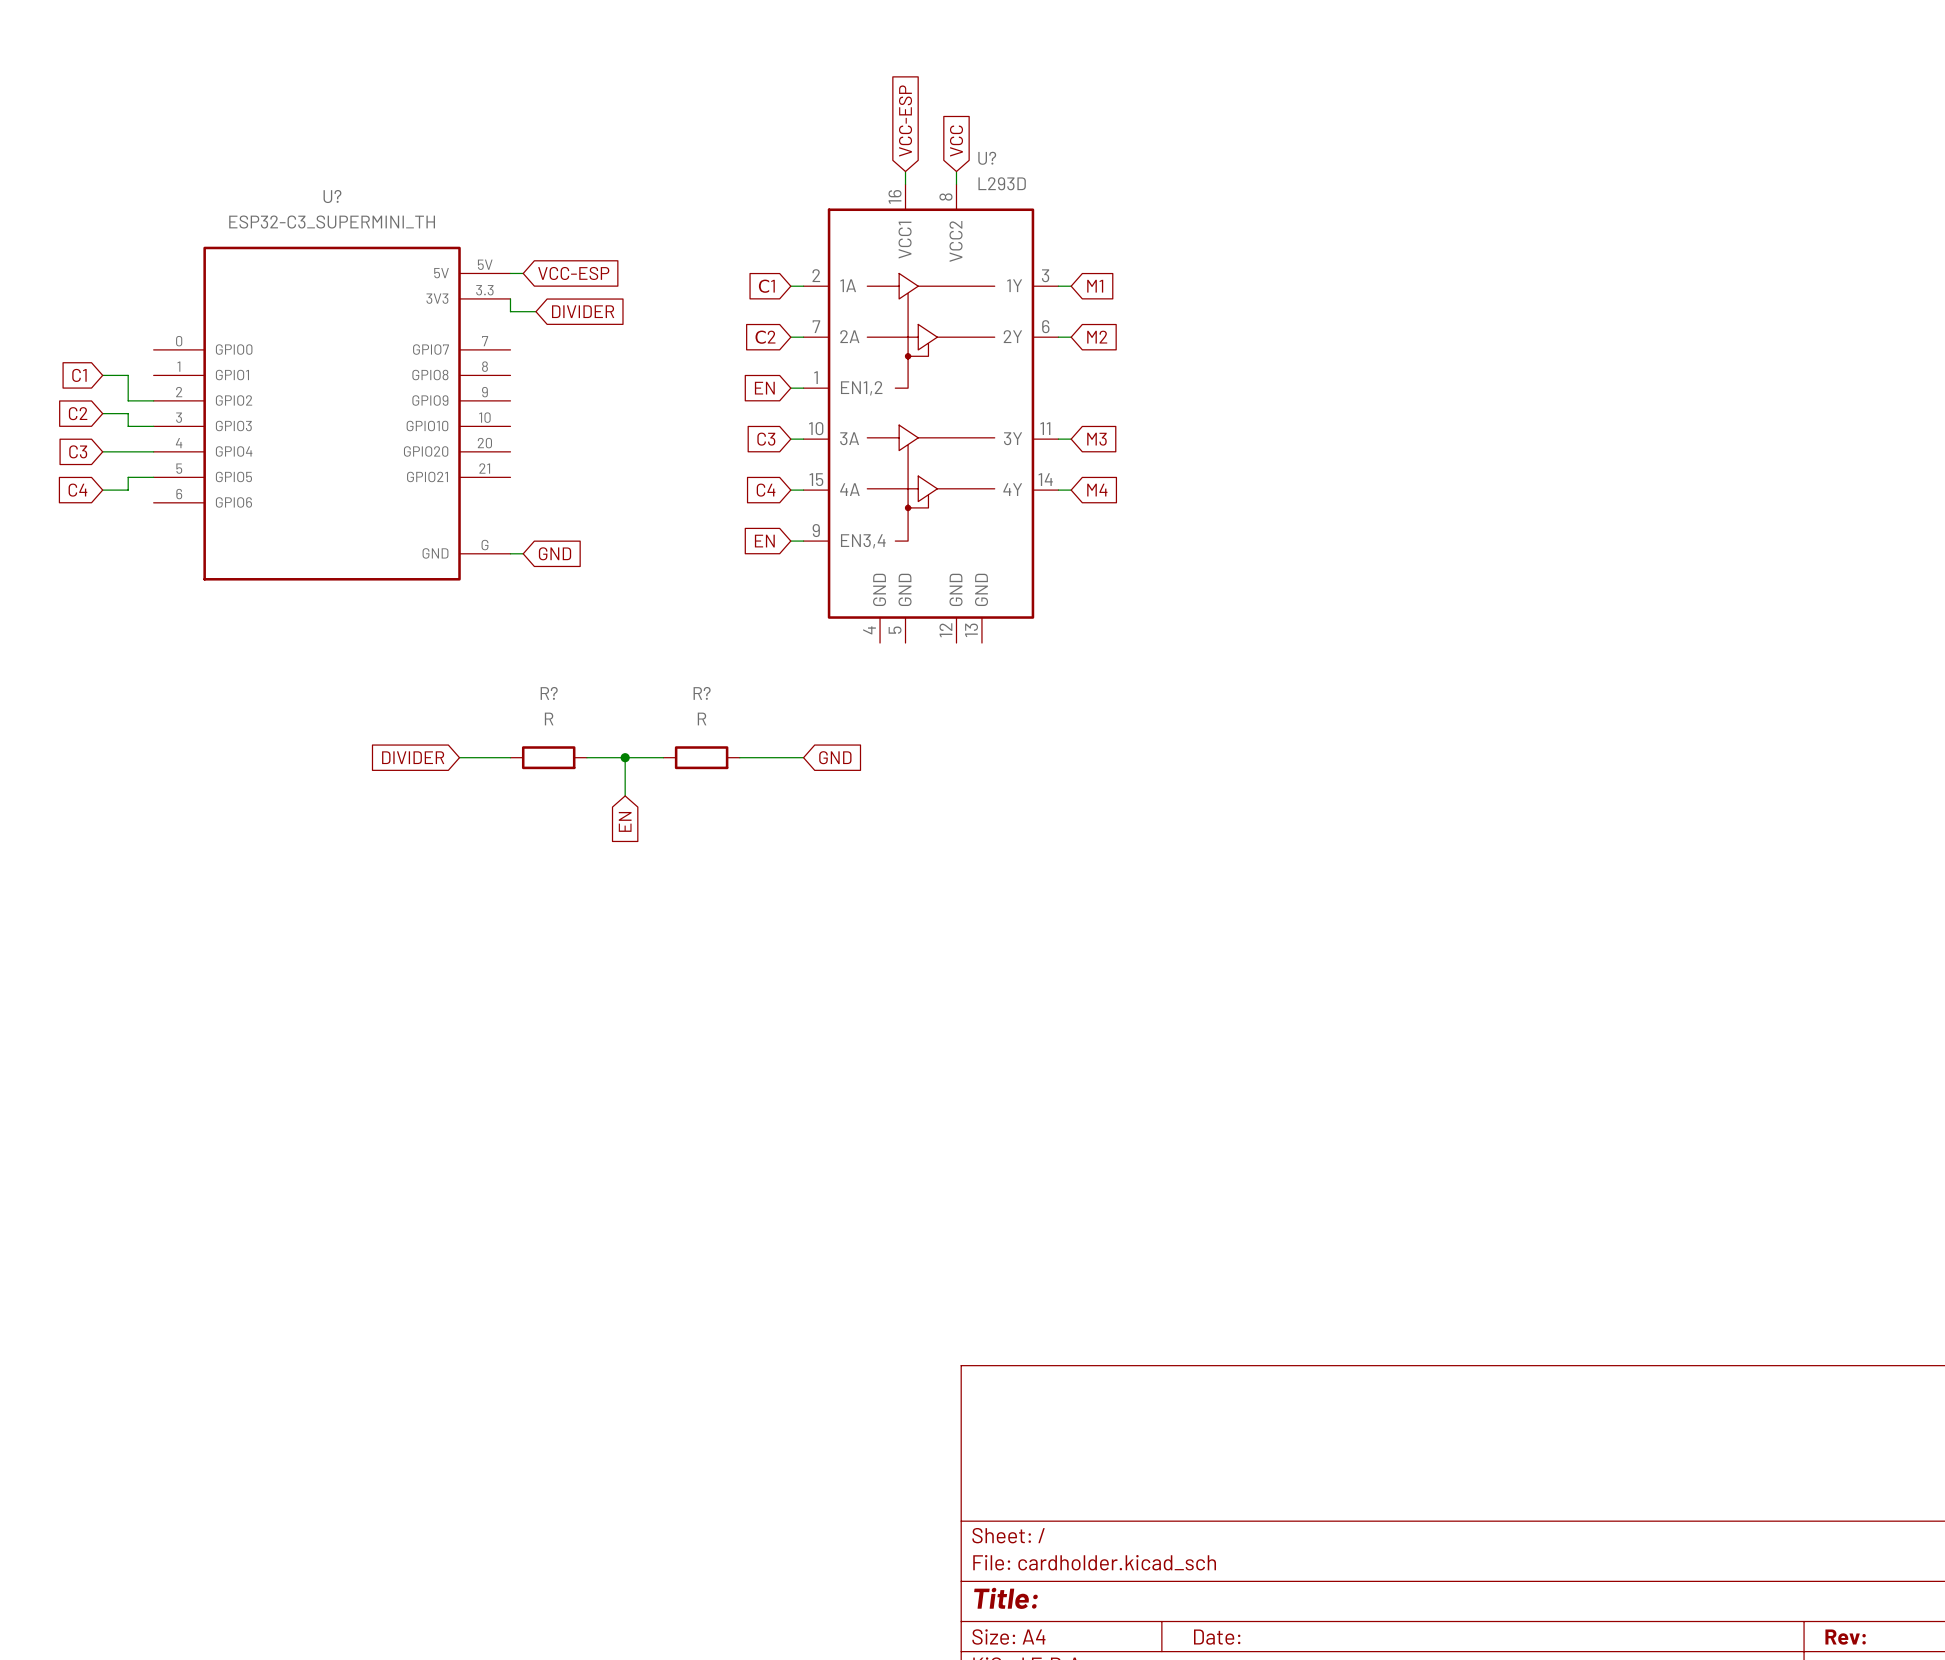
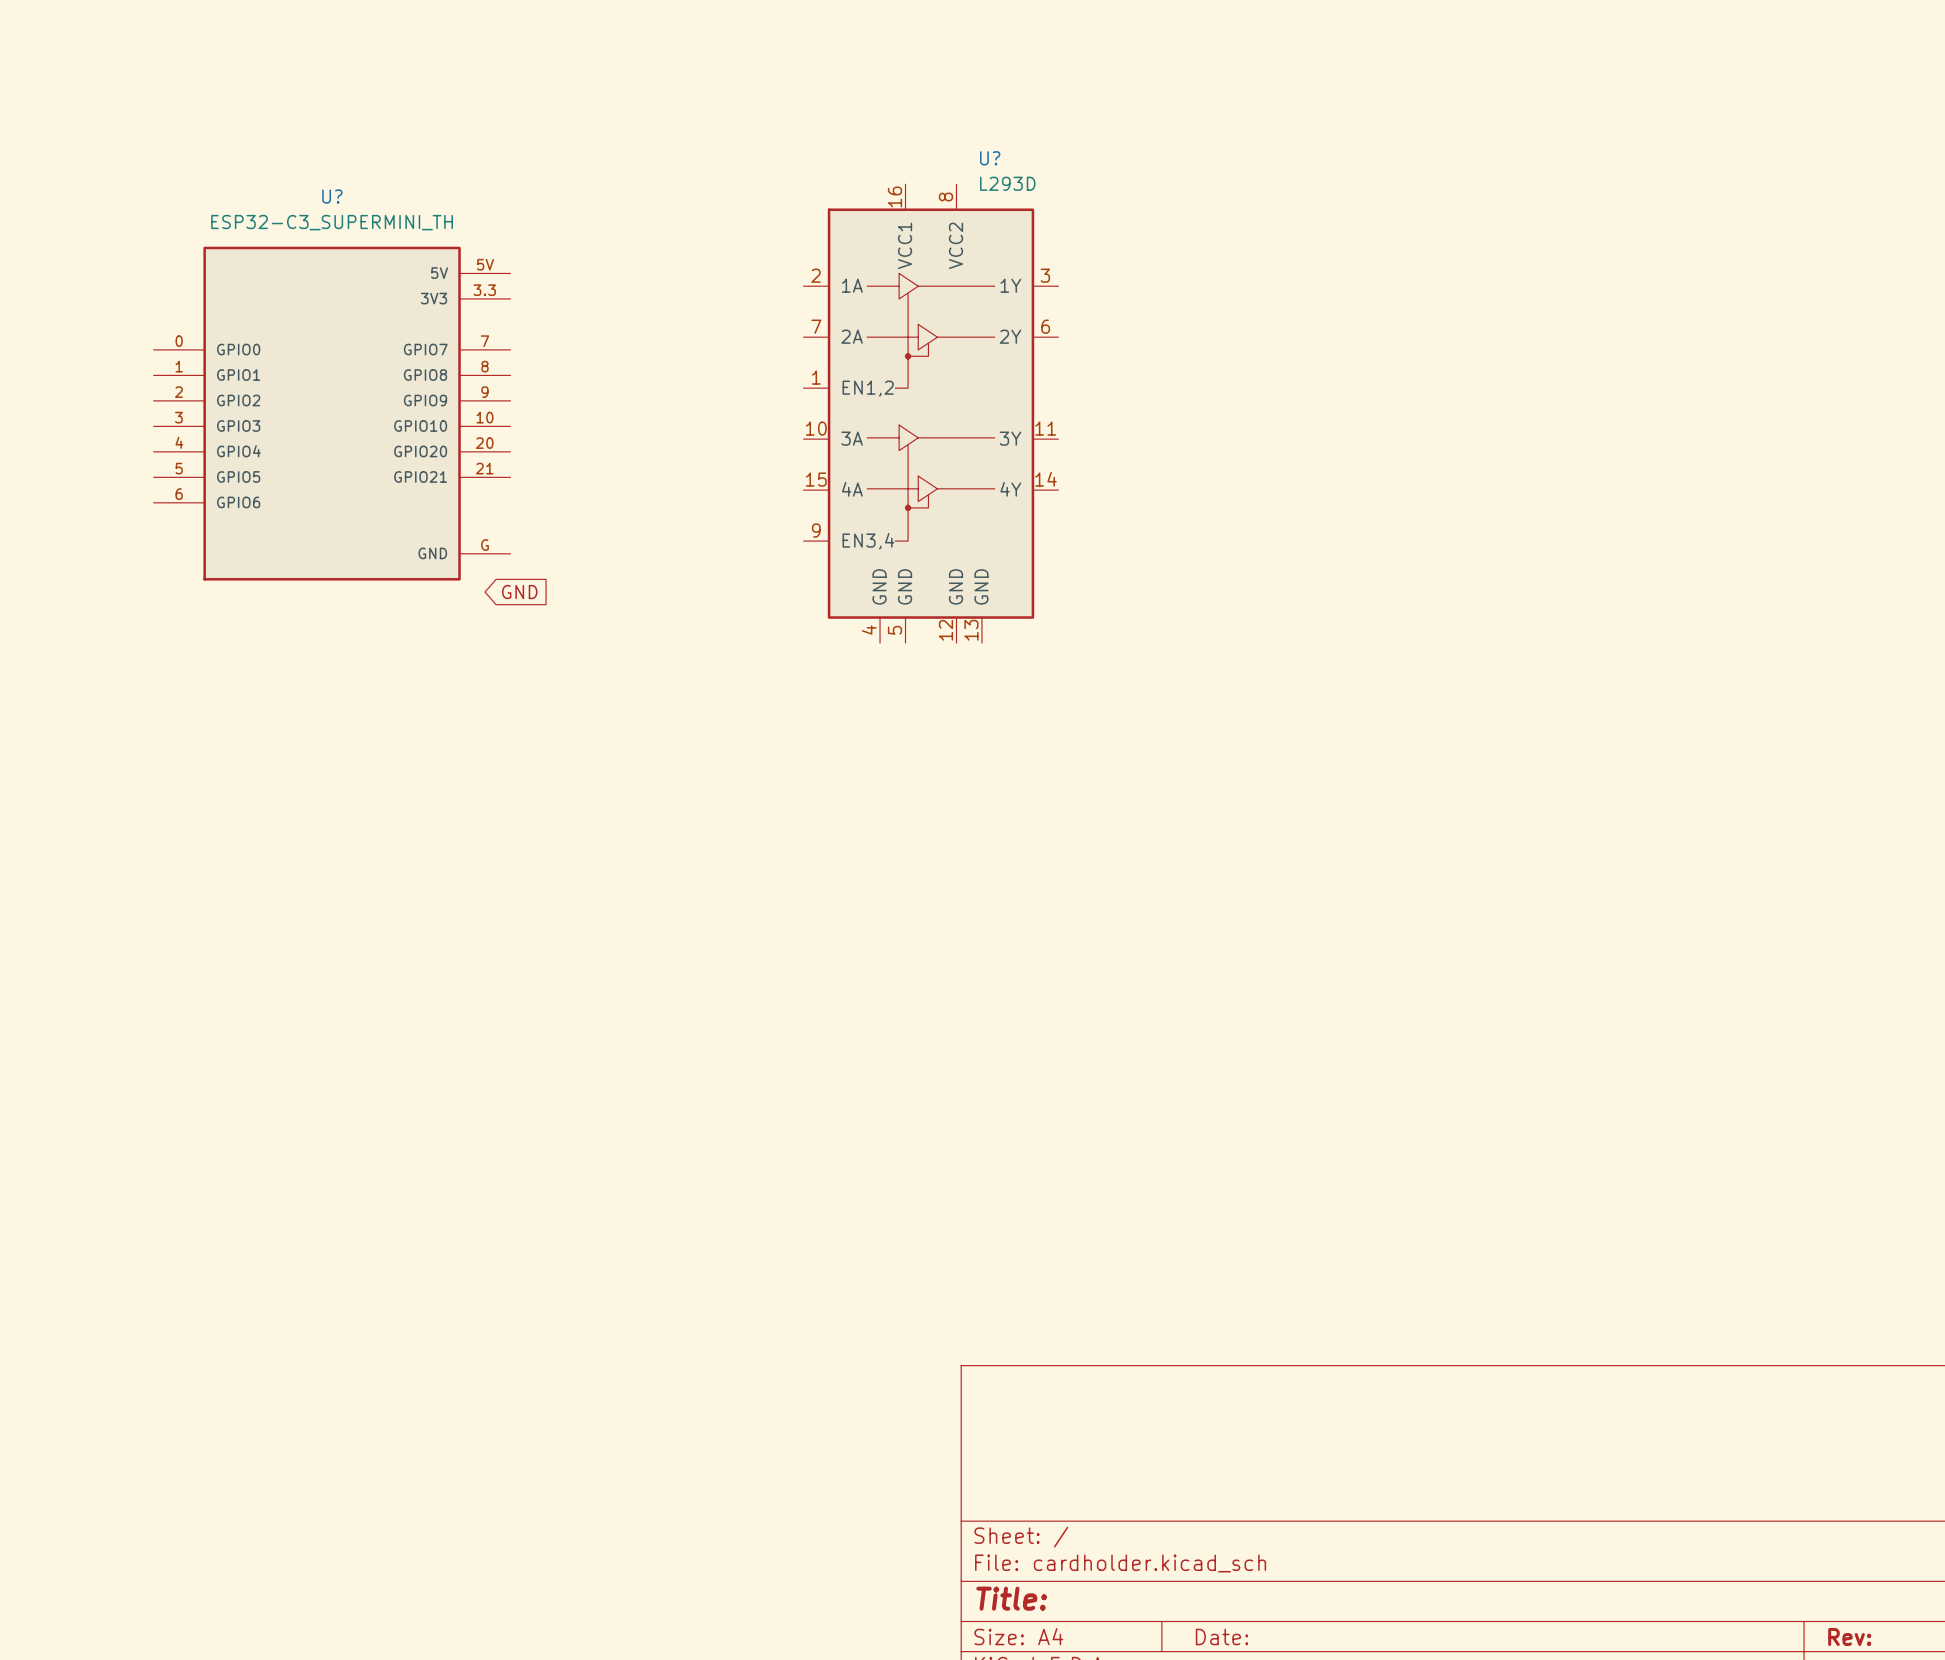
global label: VCC-ESP (905, 120) -> none
global label: VCC (956, 141) -> none
wire: (905, 171) (905, 184) -> none
wire: (956, 171) (956, 184) -> none
wire: (510, 273) (523, 273) -> none
global label: VCC-ESP (573, 273) -> none
global label: С1 (766, 286) -> none
wire: (790, 286) (803, 286) -> none
wire: (1058, 286) (1071, 286) -> none
global label: M1 (1095, 286) -> none
wire: (510, 298) (510, 311) (535, 311) -> none
global label: DIVIDER (583, 311) -> none
global label: С2 (765, 337) -> none
wire: (790, 337) (803, 337) -> none
wire: (1058, 337) (1071, 337) -> none
global label: M2 (1097, 337) -> none
global label: C1 (79, 375) -> none
wire: (102, 375) (128, 375) (128, 400) (153, 400) -> none
global label: EN (764, 388) -> none
wire: (790, 388) (803, 388) -> none
global label: C2 (78, 413) -> none
wire: (102, 413) (128, 413) (128, 426) (153, 426) -> none
global label: C3 (766, 439) -> none
wire: (790, 439) (803, 439) -> none
wire: (1058, 439) (1071, 439) -> none
global label: M3 (1096, 439) -> none
global label: C3 (78, 451) -> none
wire: (102, 451) (153, 451) -> none
wire: (153, 477) (128, 477) (128, 490) (102, 490) -> none
global label: C4 (77, 490) -> none
global label: C4 (766, 490) -> none
wire: (790, 490) (803, 490) -> none
wire: (1058, 490) (1071, 490) -> none
global label: M4 (1097, 490) -> none
global label: EN (764, 541) -> none
wire: (790, 541) (803, 541) -> none
wire: (510, 553) (523, 553) -> none
global label position: GND (555, 553) -> GND (519, 592)
global label: DIVIDER (413, 757) -> none
wire: (459, 757) (510, 757) -> none
R?: R (548, 757) -> none
wire: (586, 757) (663, 757) -> none
wire: (625, 757) (625, 795) -> none
junction: (625, 757) -> none
R?: R (701, 757) -> none
wire: (739, 757) (803, 757) -> none
global label: GND (835, 757) -> none
global label: EN (625, 821) -> none

